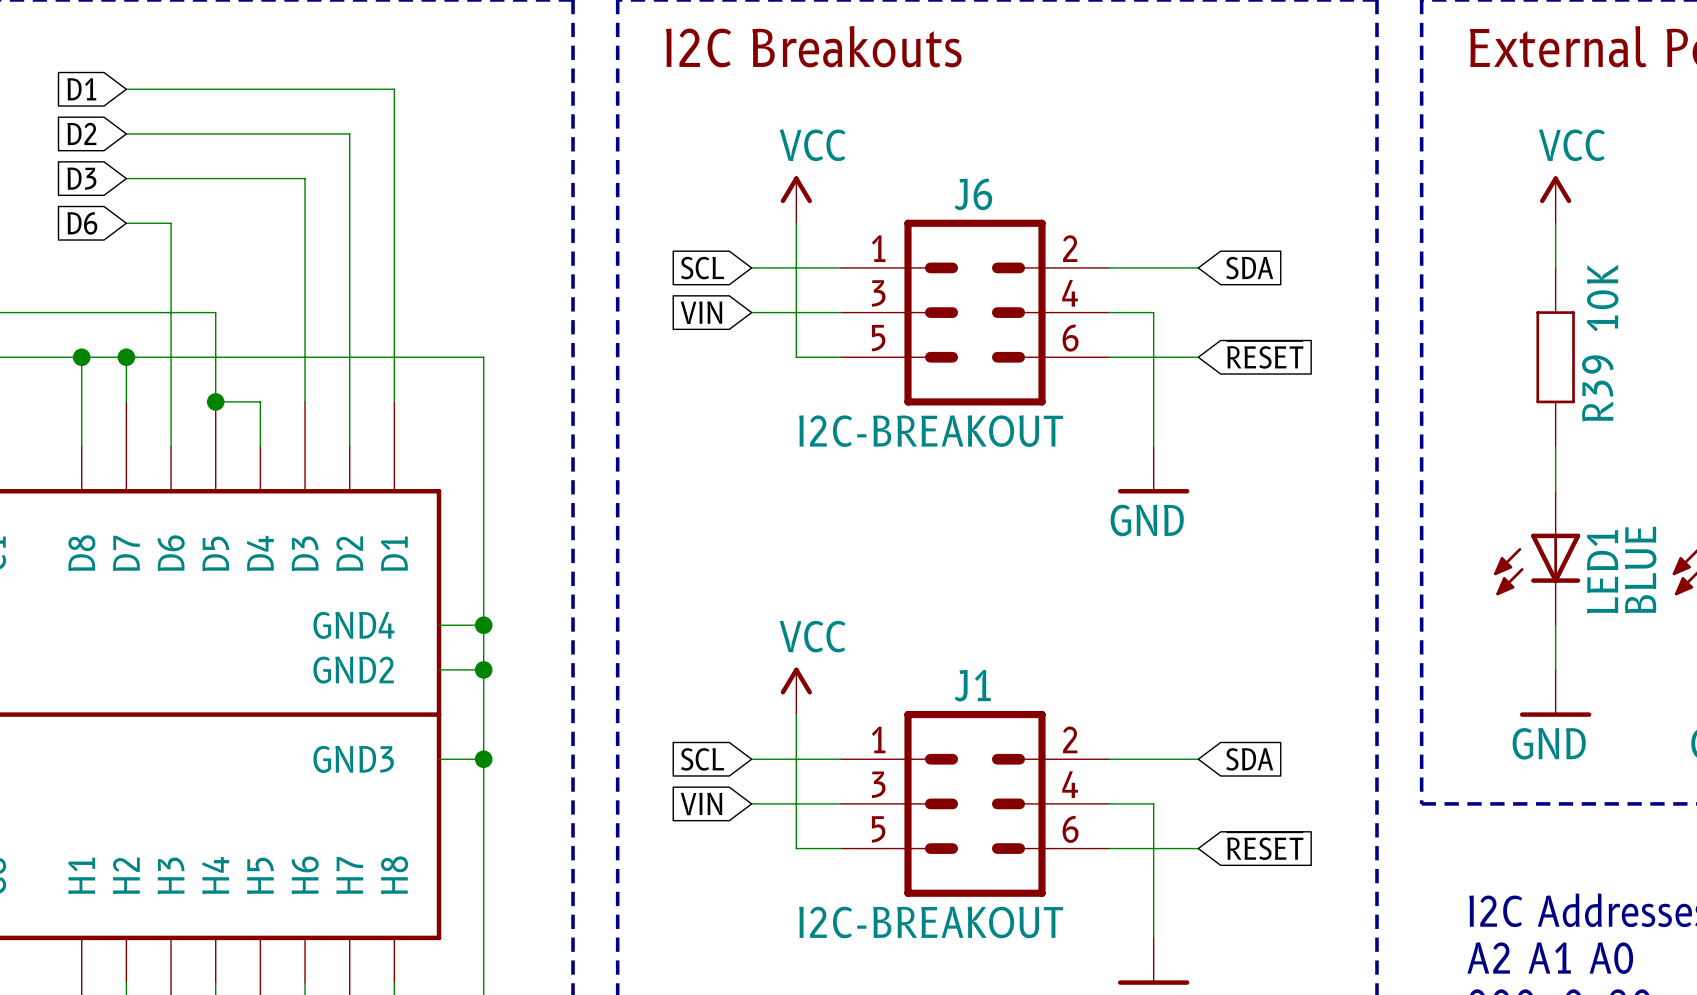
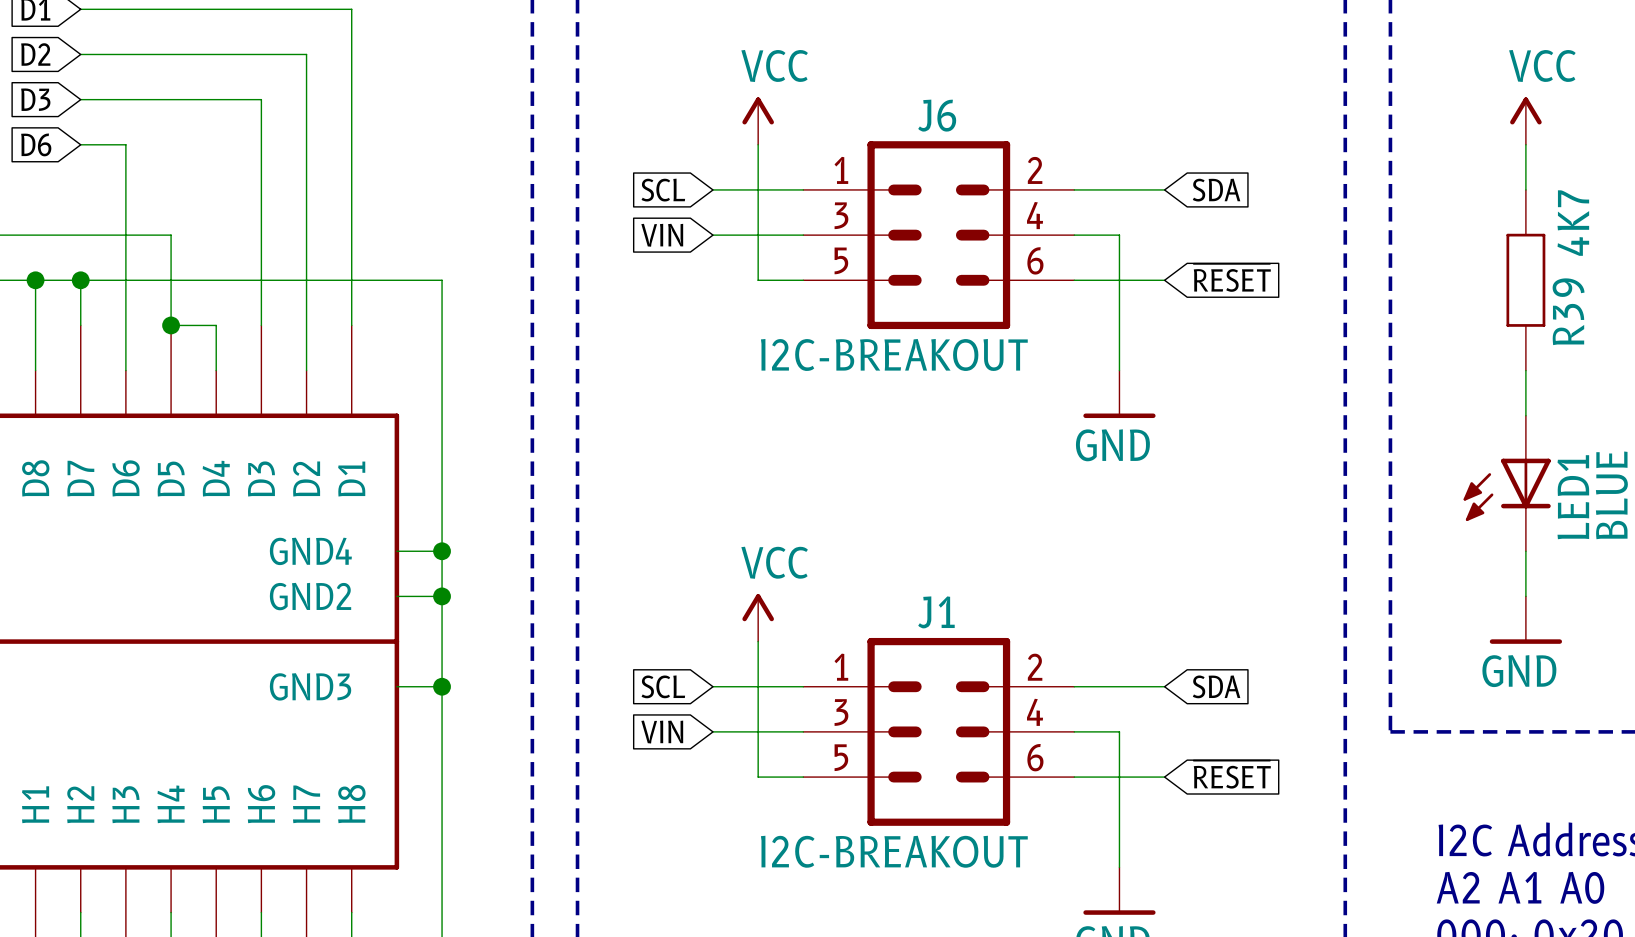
R39 value: 10K (1602, 298) -> 4K7 (1573, 223)

